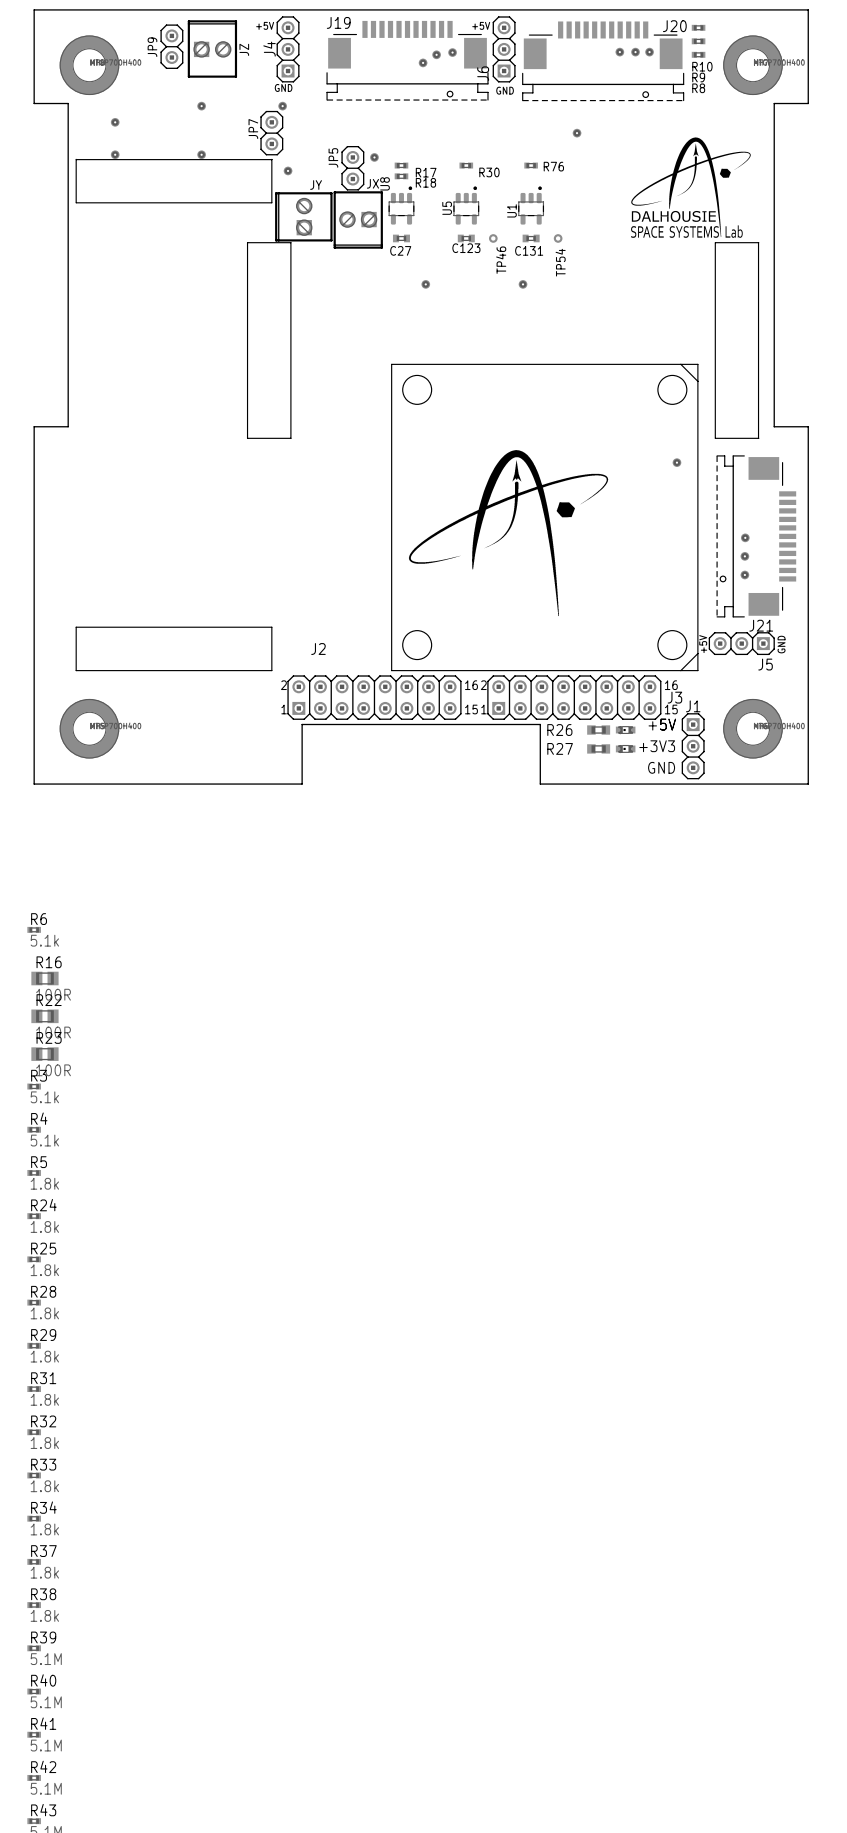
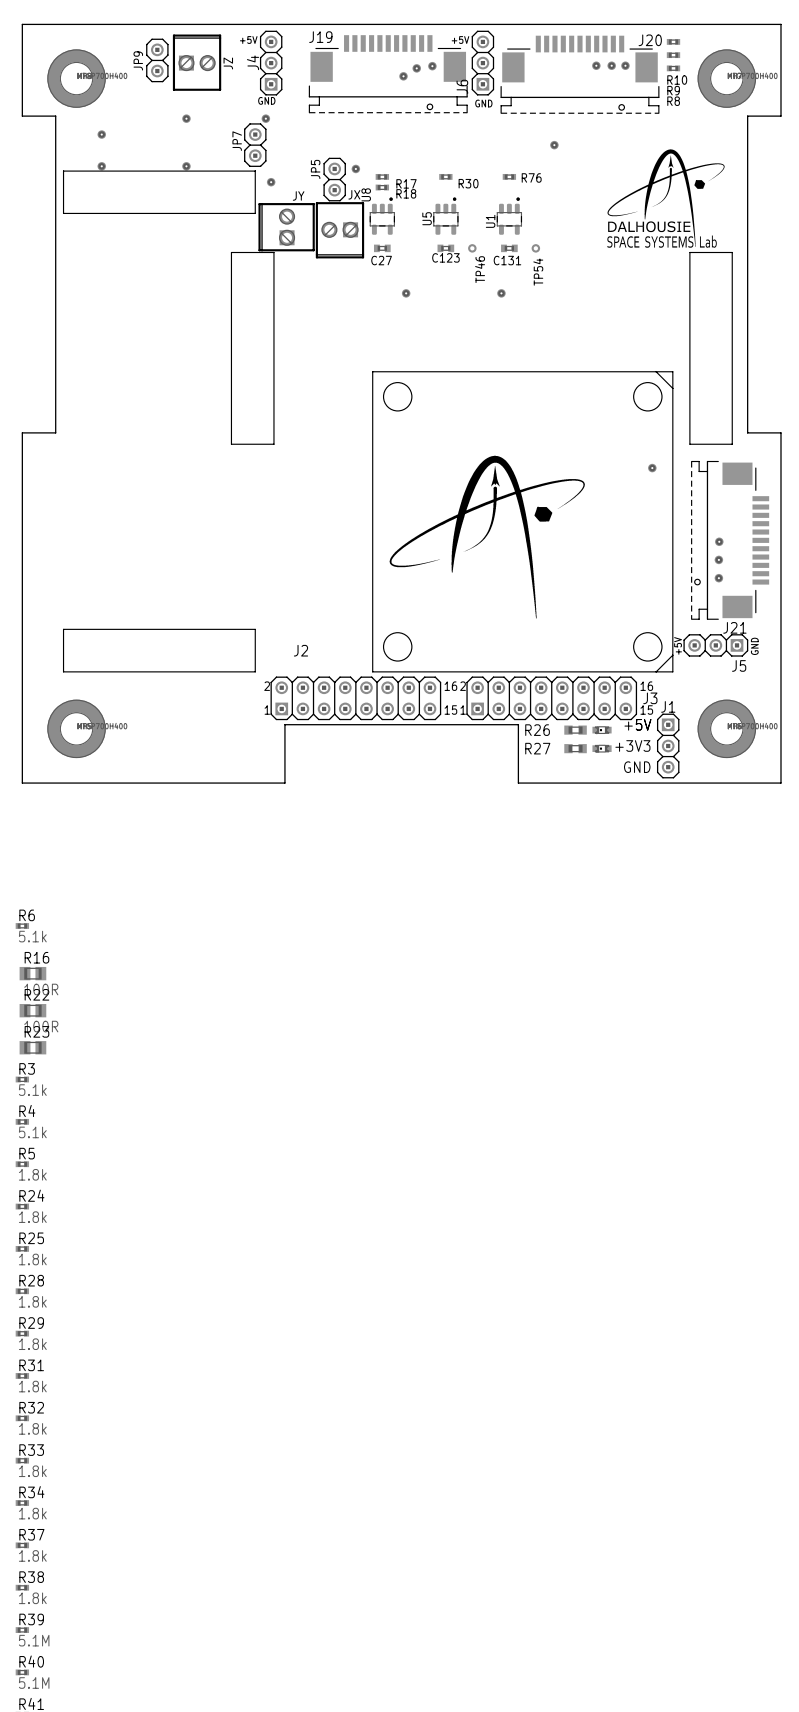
R23 value: 100R (53, 1070) -> none

